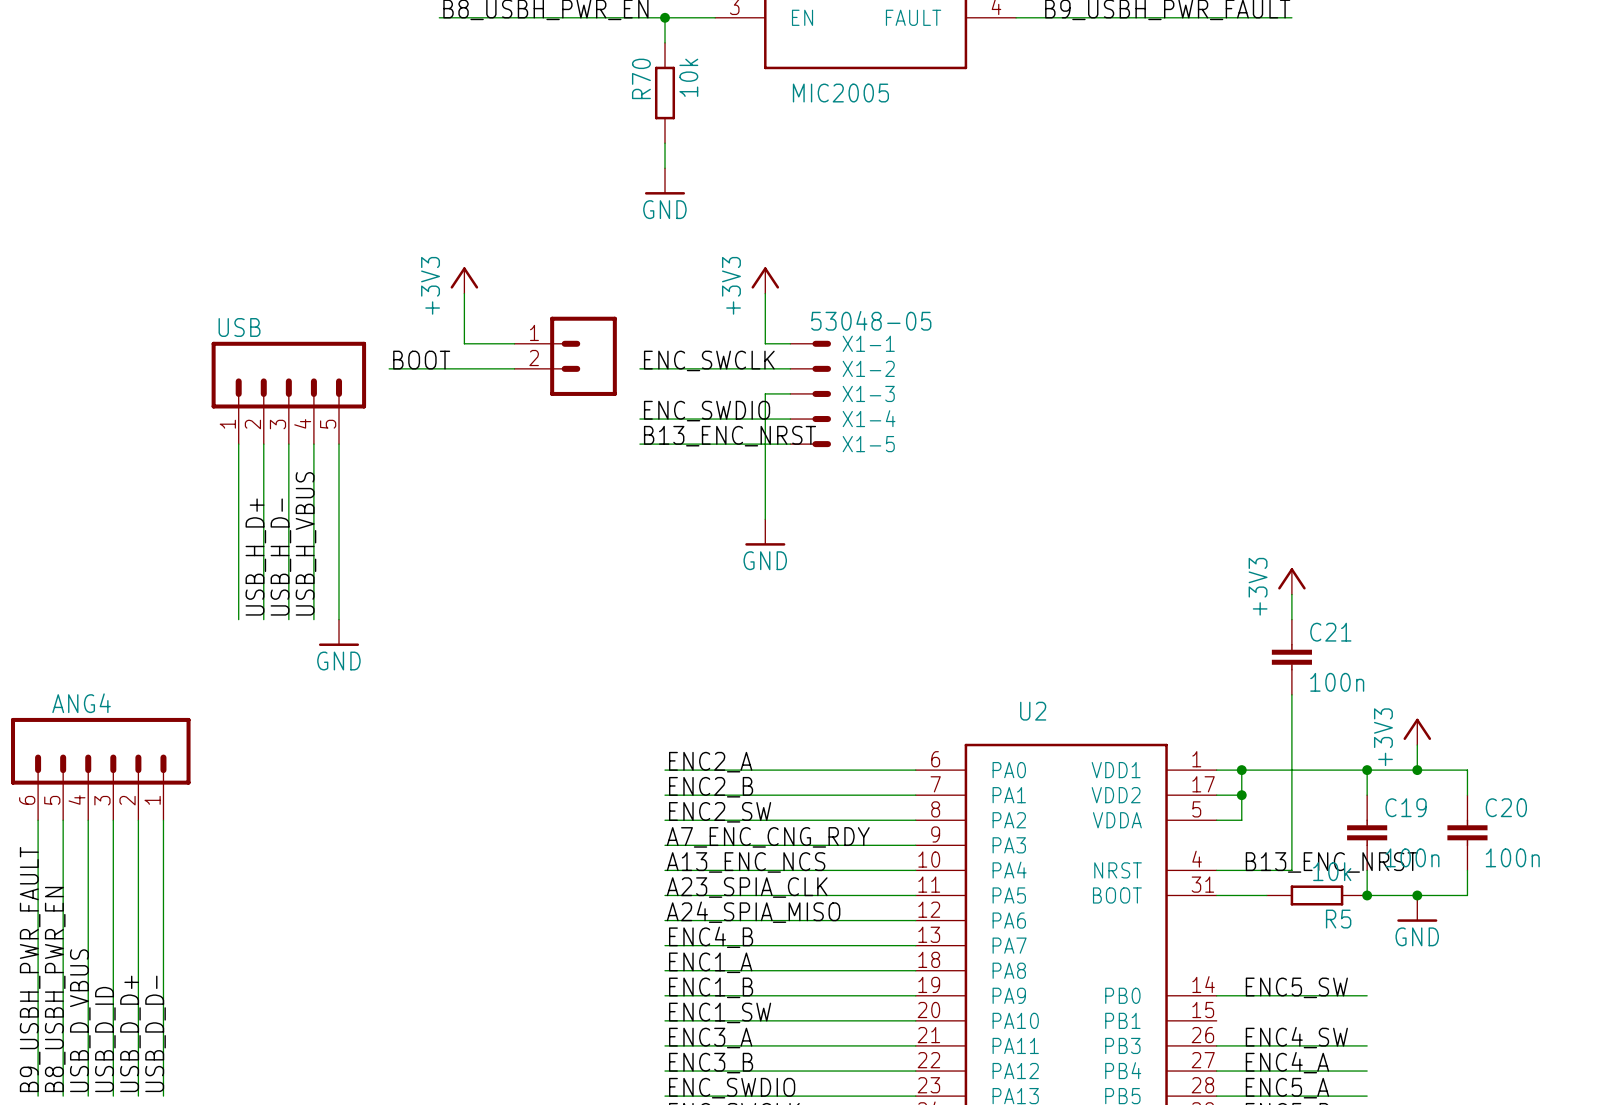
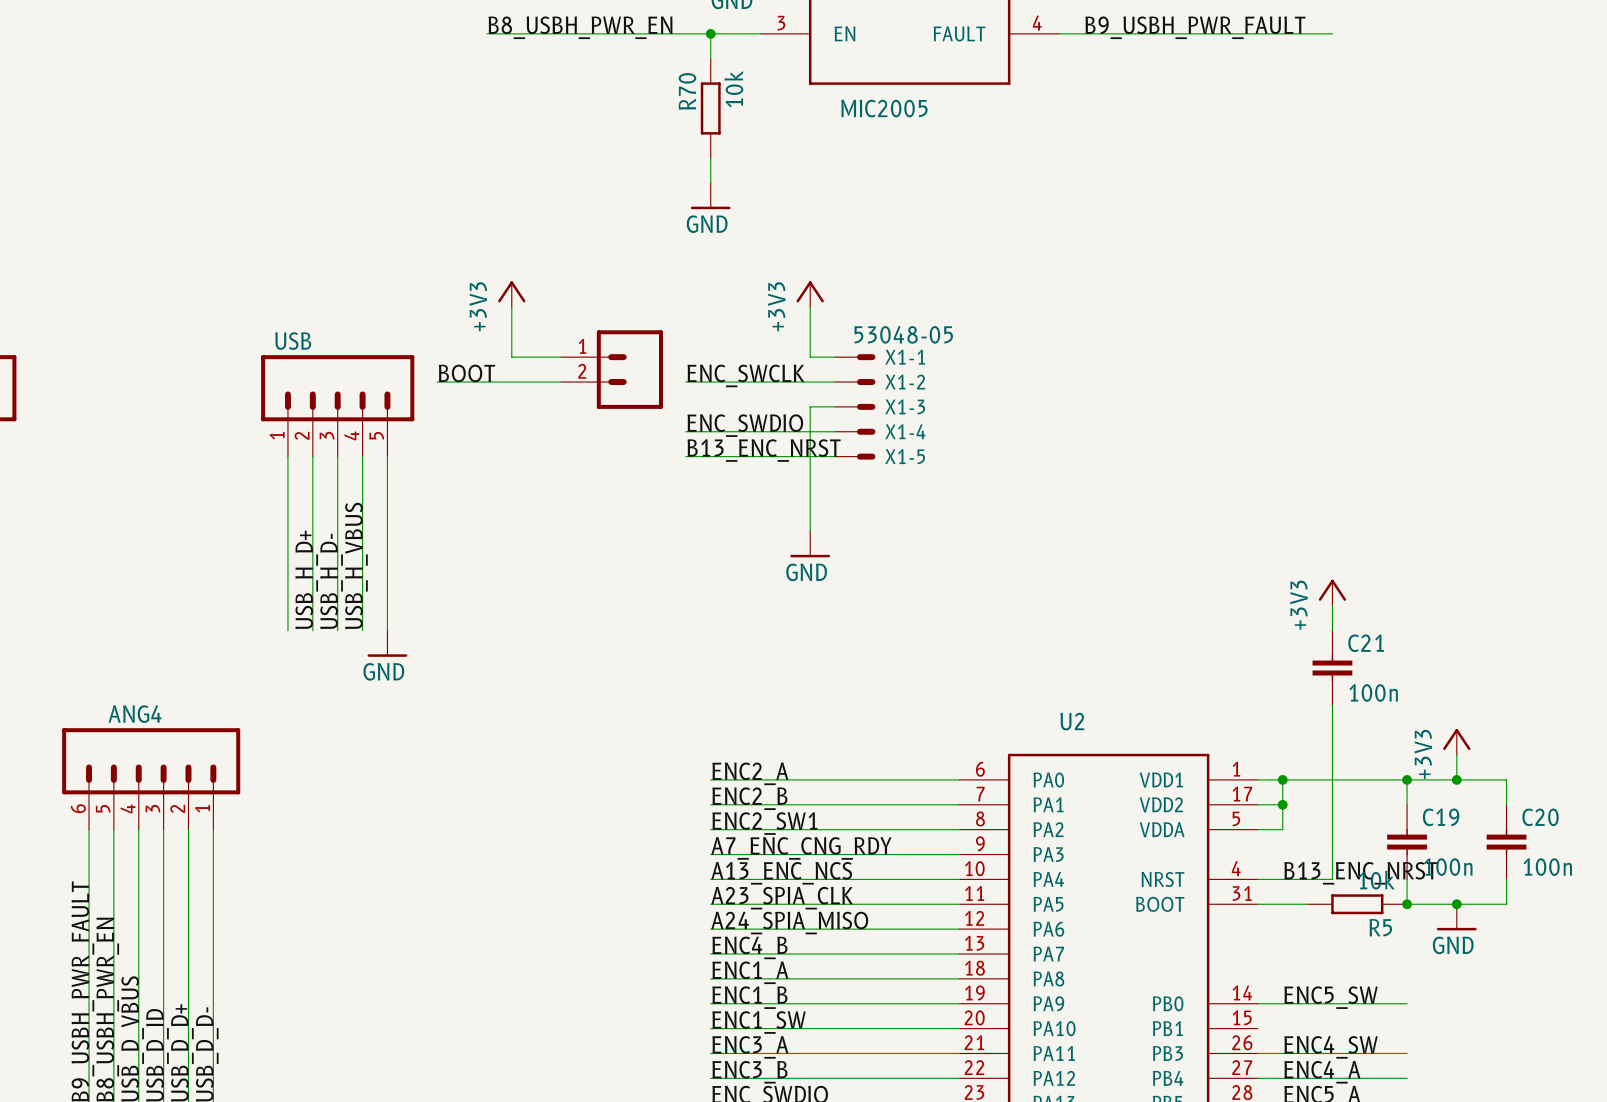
label: ENC2_SW (720, 812) -> ENC2_SW1 (764, 823)

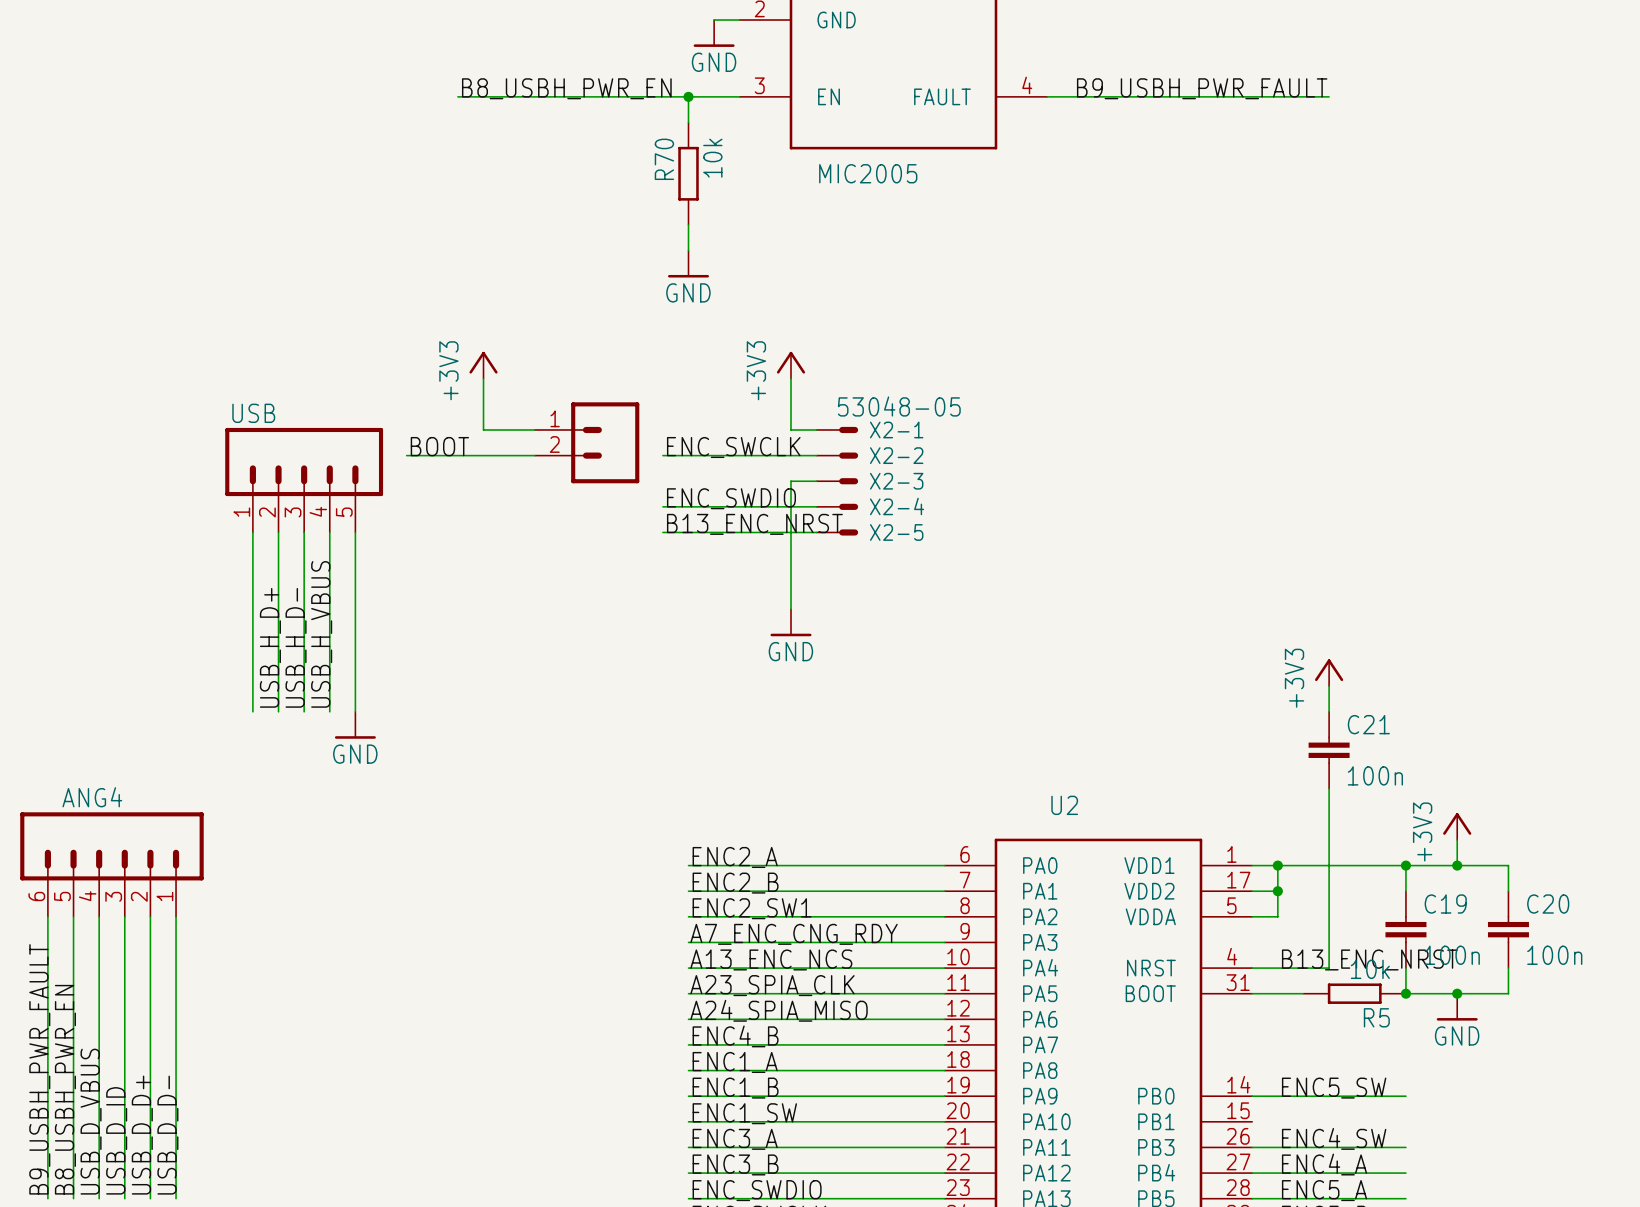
X1-1 name: X1-1 (905, 357) -> X2-1 (896, 429)
X1-2 name: X1-2 (905, 382) -> X2-2 (896, 455)
X1-3 name: X1-3 (905, 406) -> X2-3 (896, 481)
X1-4 name: X1-4 (905, 431) -> X2-4 (897, 506)
X1-5 name: X1-5 (905, 456) -> X2-5 (896, 532)

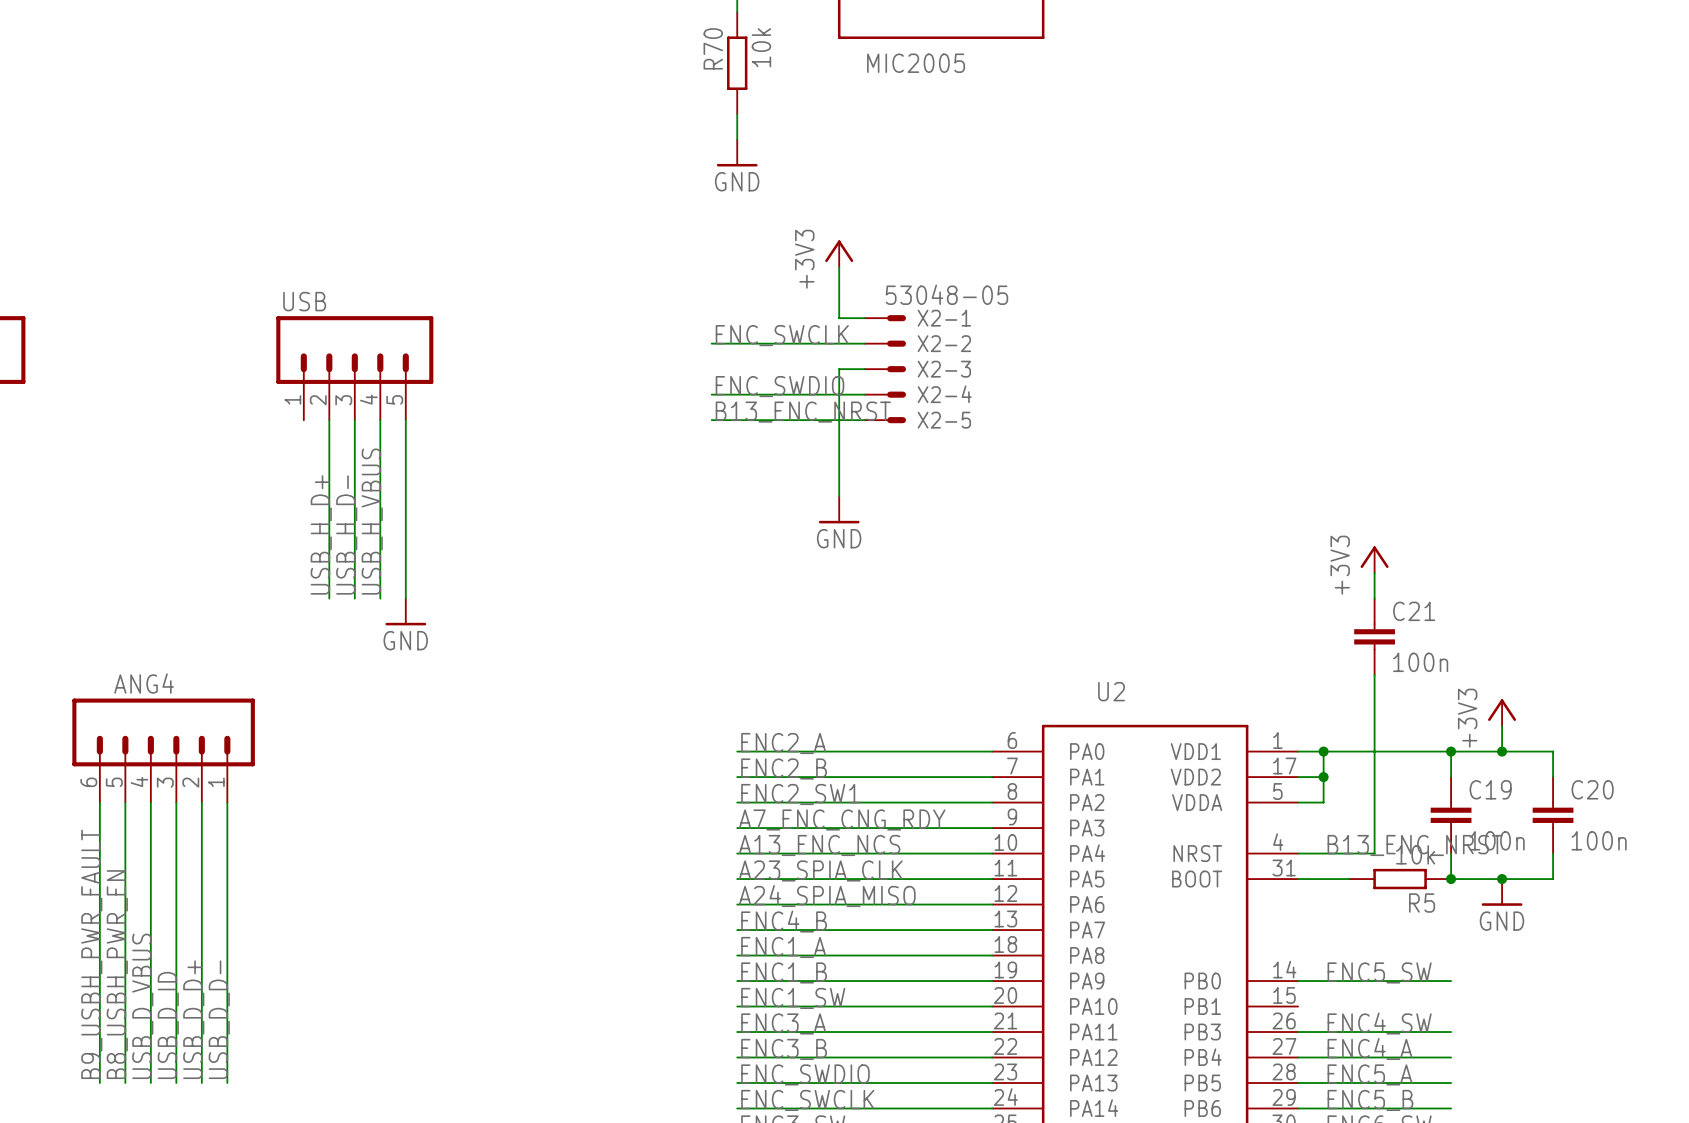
power symbol: +3V3 (483, 365) -> none
wire: (483, 378) (483, 429) (534, 429) -> none
part: (587, 442) -> none
label: BOOT (439, 446) -> none
wire: (406, 455) (534, 455) -> none
wire: (252, 532) (252, 711) -> none

